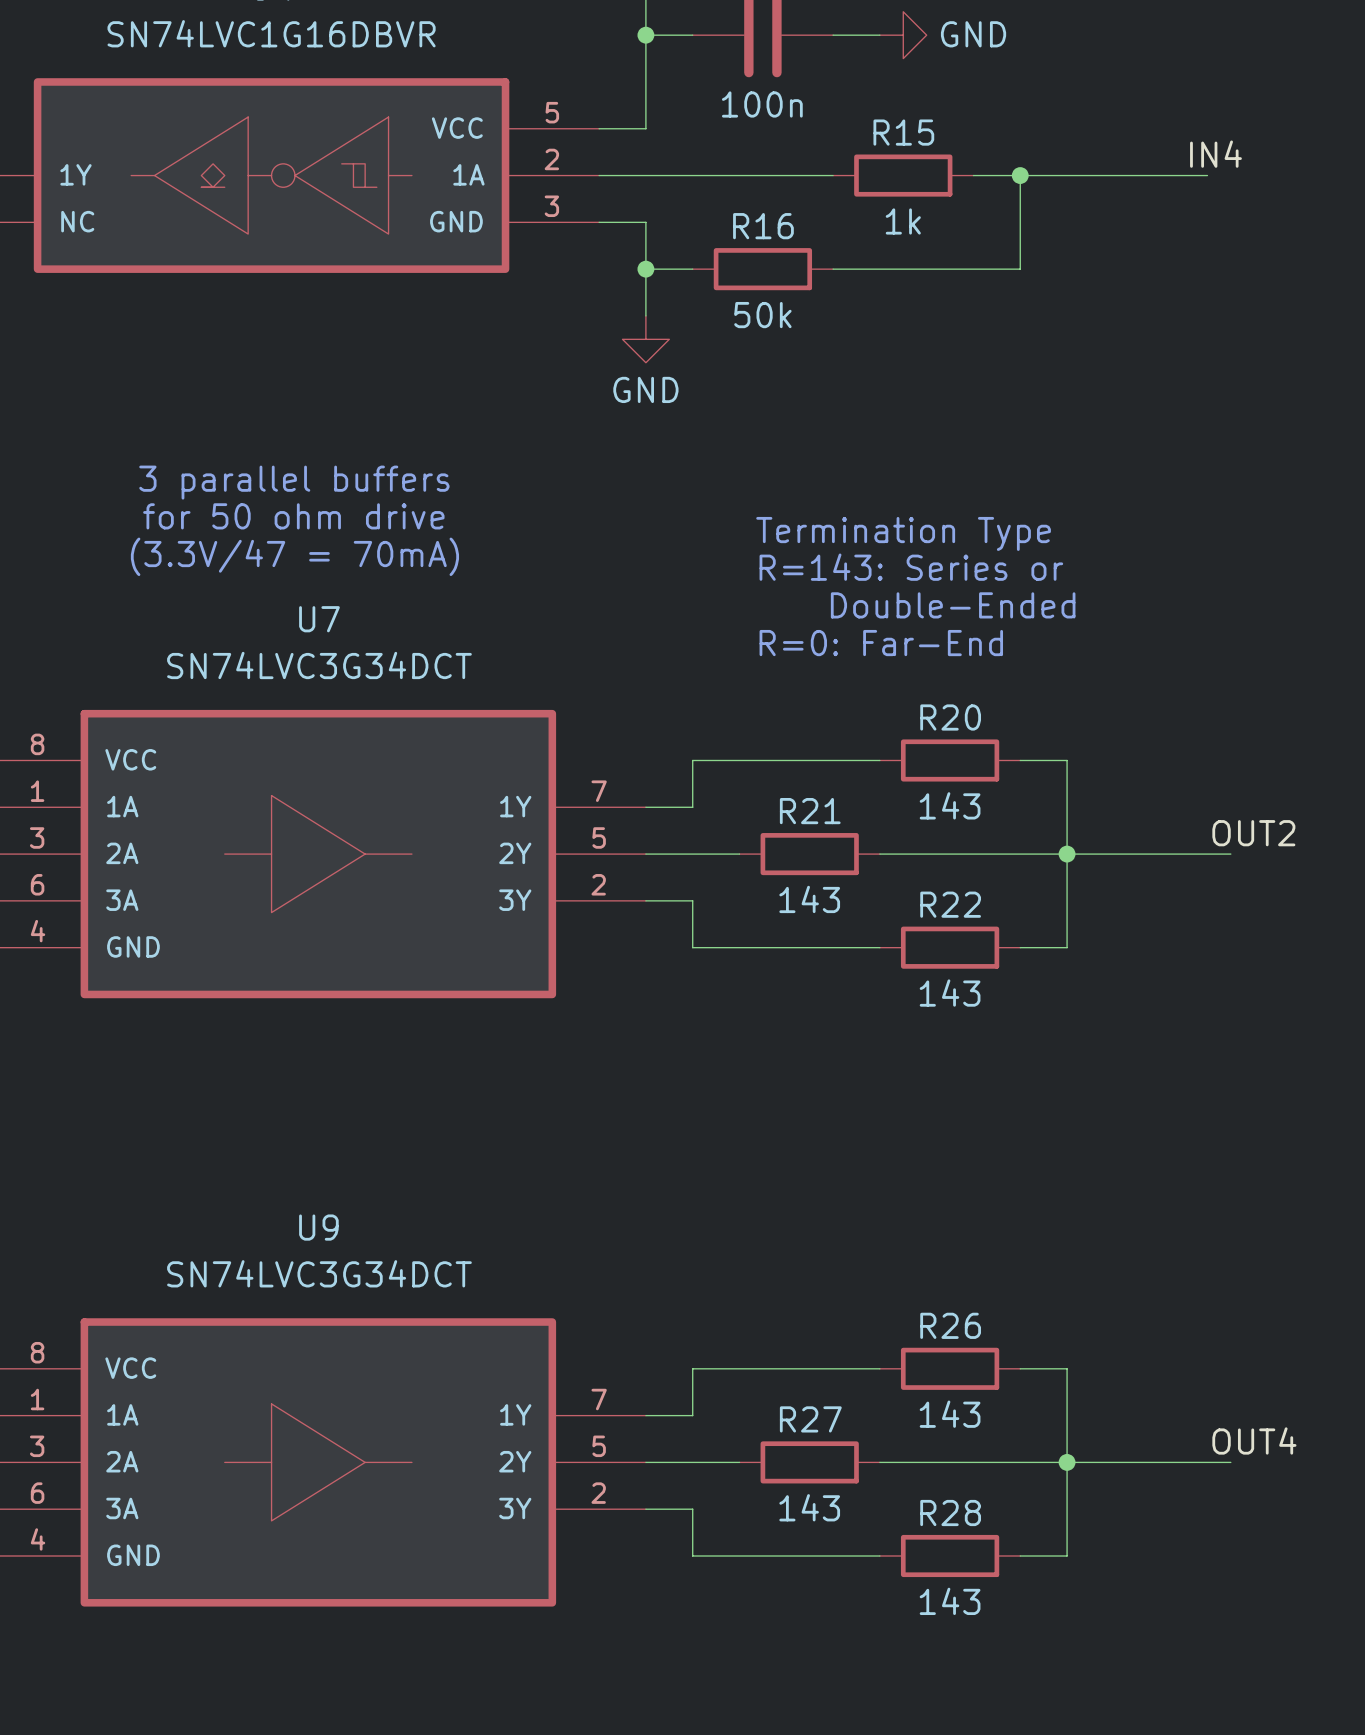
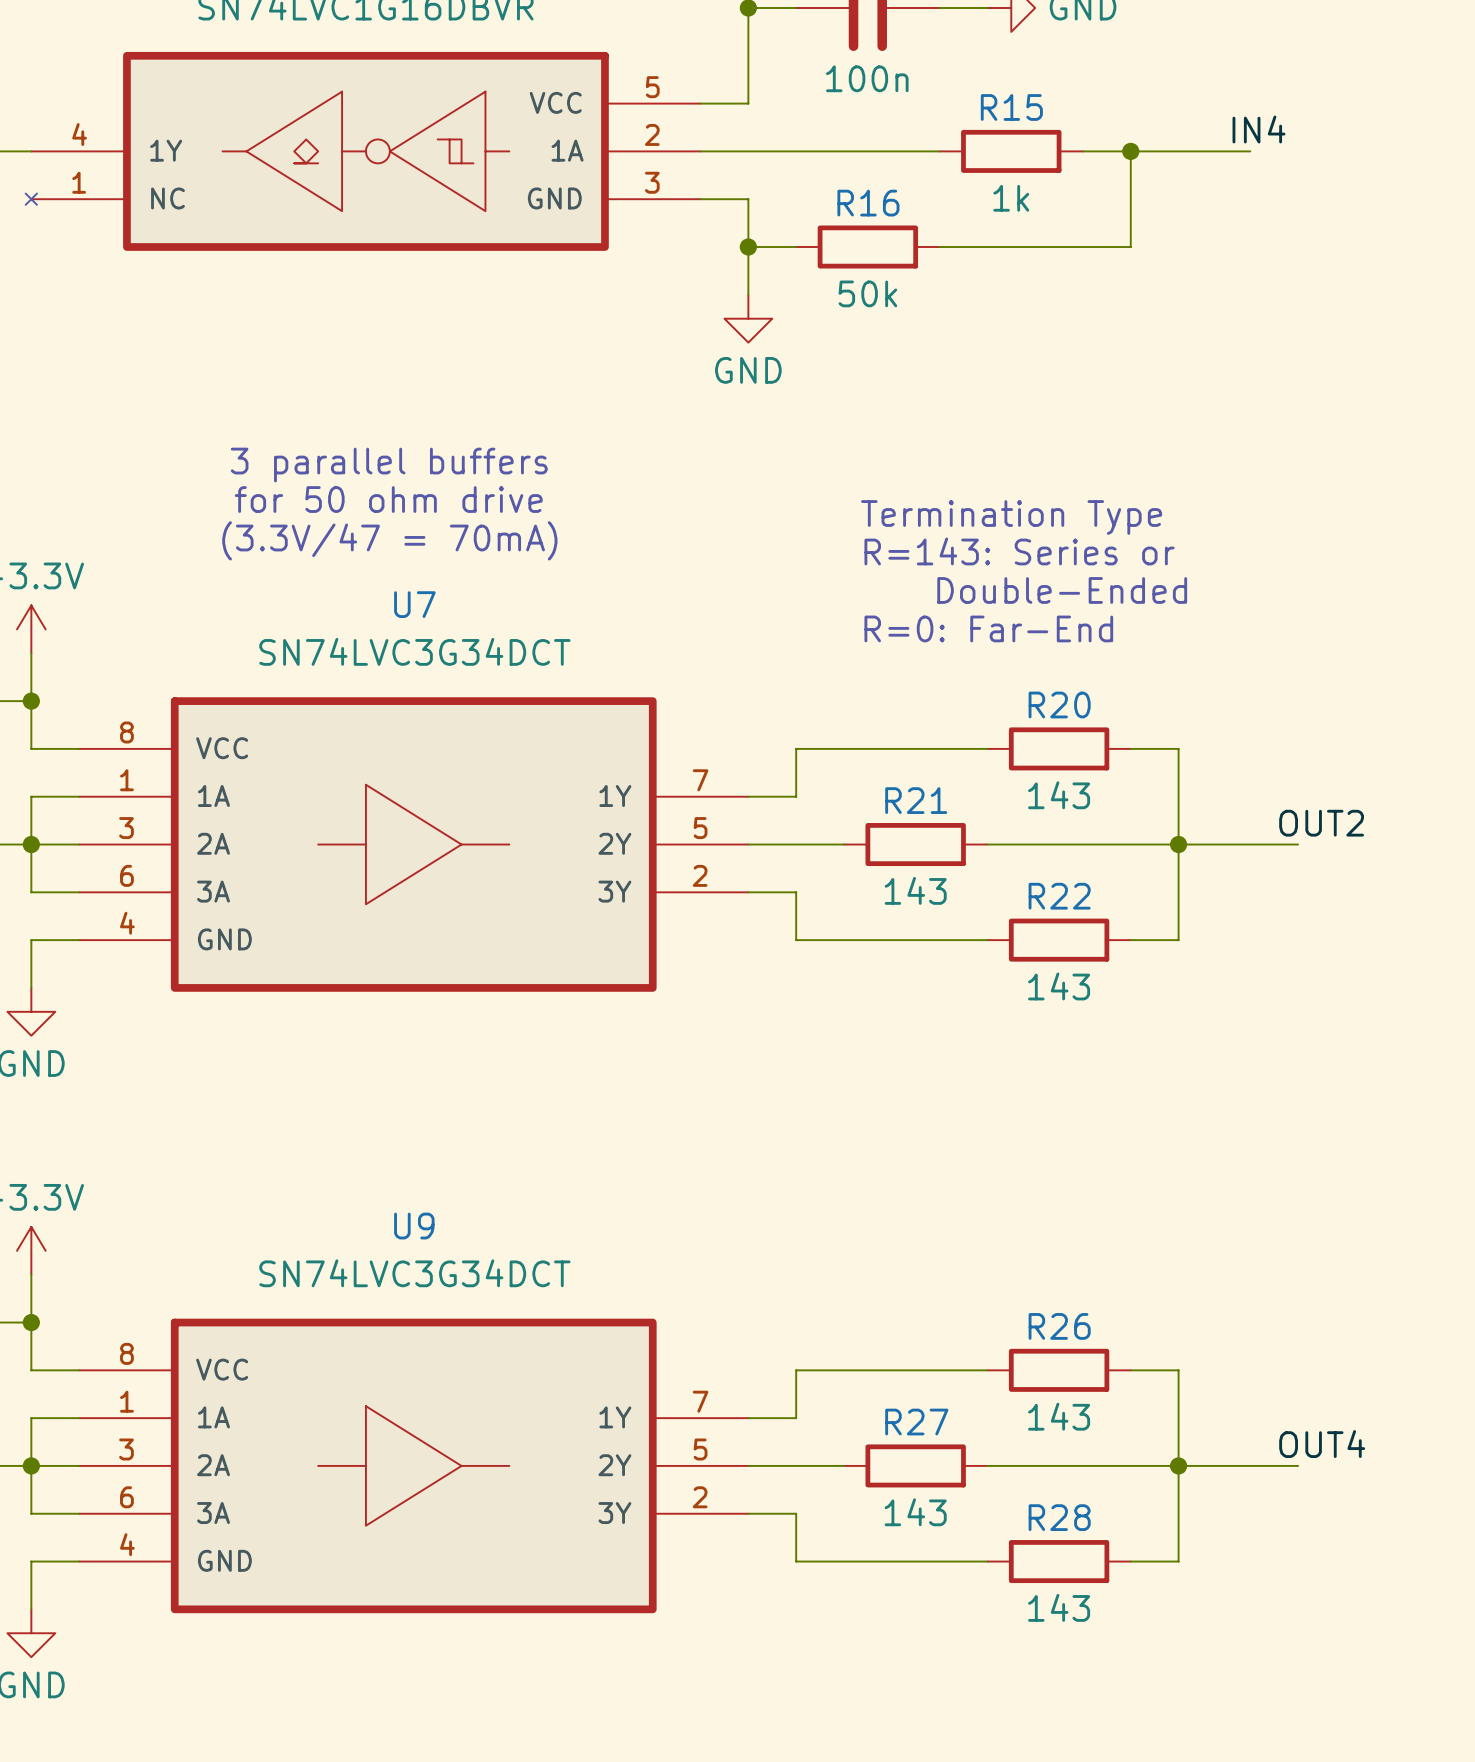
label position: IN4 (1215, 154) -> IN4 (1259, 129)
wire: (1137, 175) (1207, 175) -> none
label position: OUT2 (1253, 833) -> OUT2 (1321, 823)
wire: (1184, 854) (1230, 854) -> none
label position: OUT4 (1254, 1440) -> OUT4 (1322, 1444)
wire: (1184, 1462) (1230, 1462) -> none

